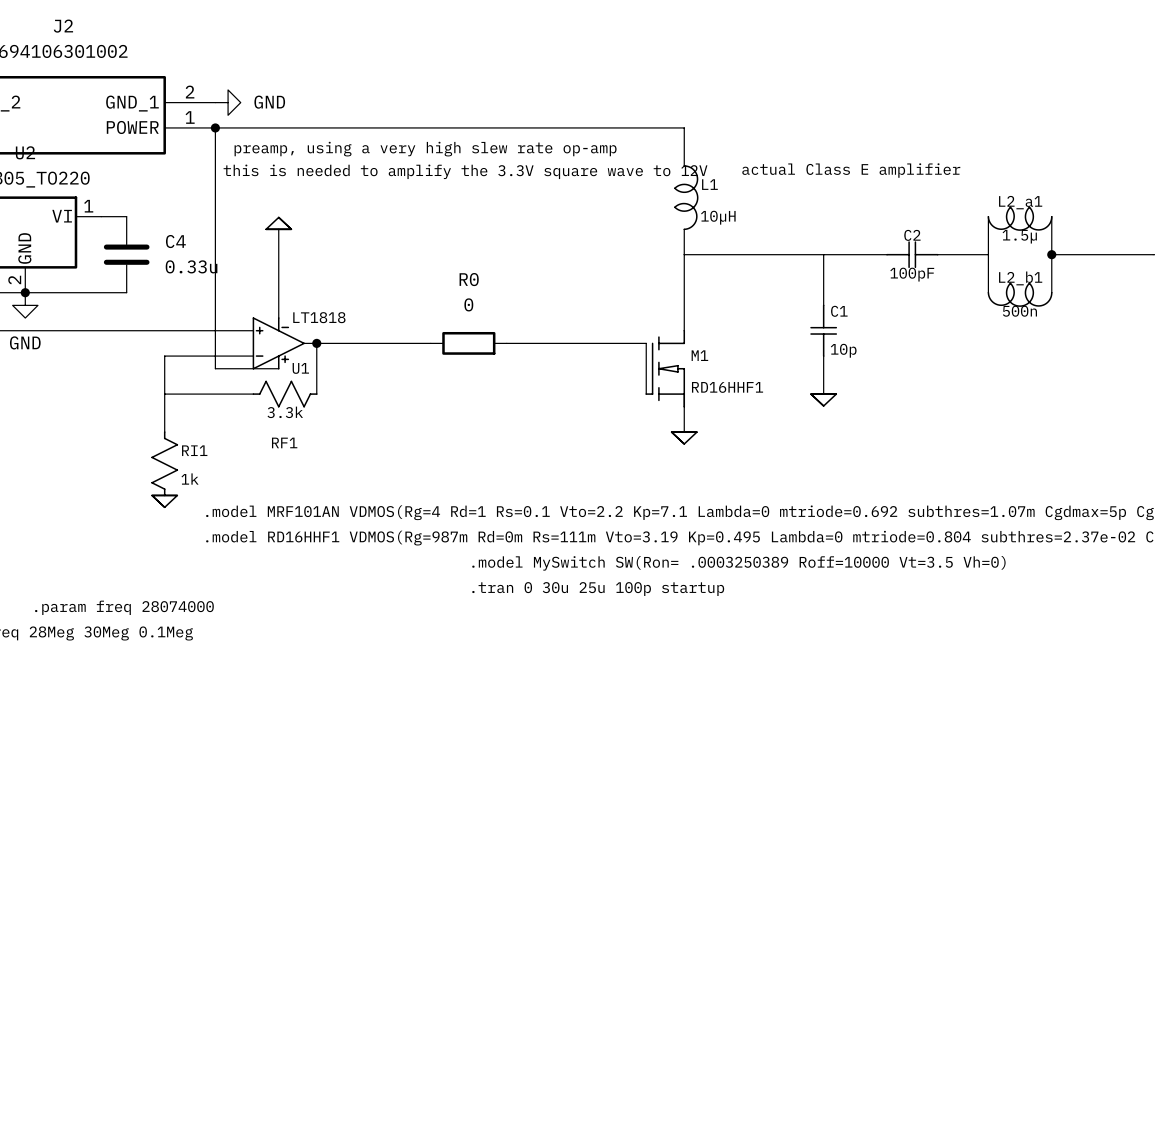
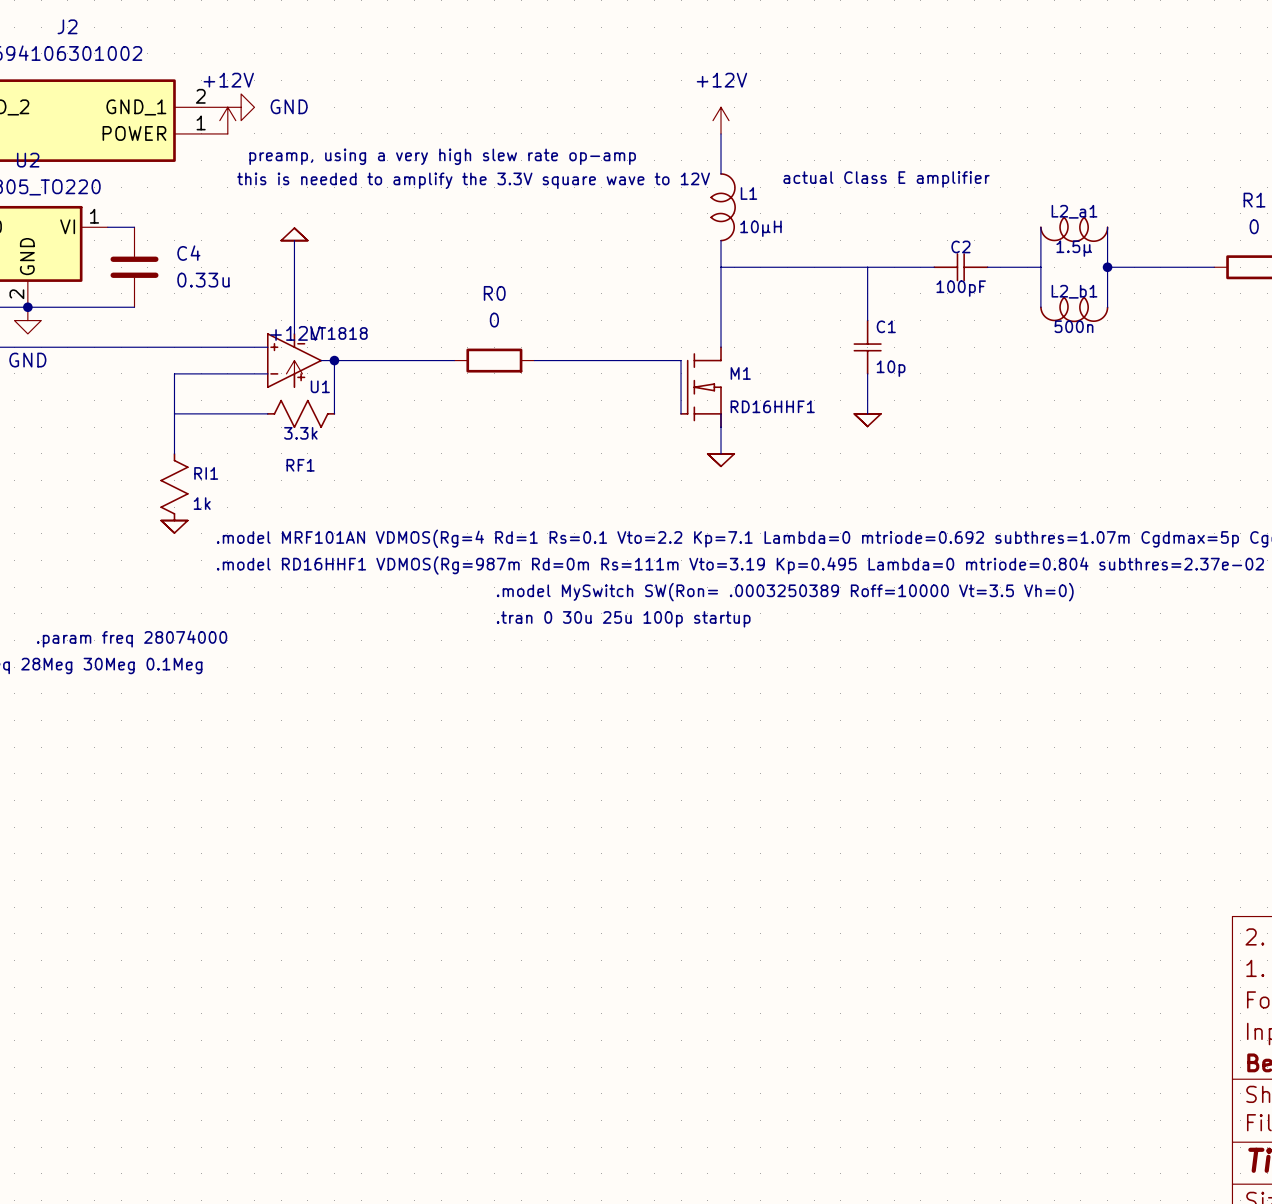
power symbol: none -> +12V (227, 120)
power symbol: none -> +12V (721, 120)
junction: (215, 127) -> none
wire: (684, 127) (215, 127) (215, 368) (278, 368) -> none
power symbol: none -> +12V (294, 373)

